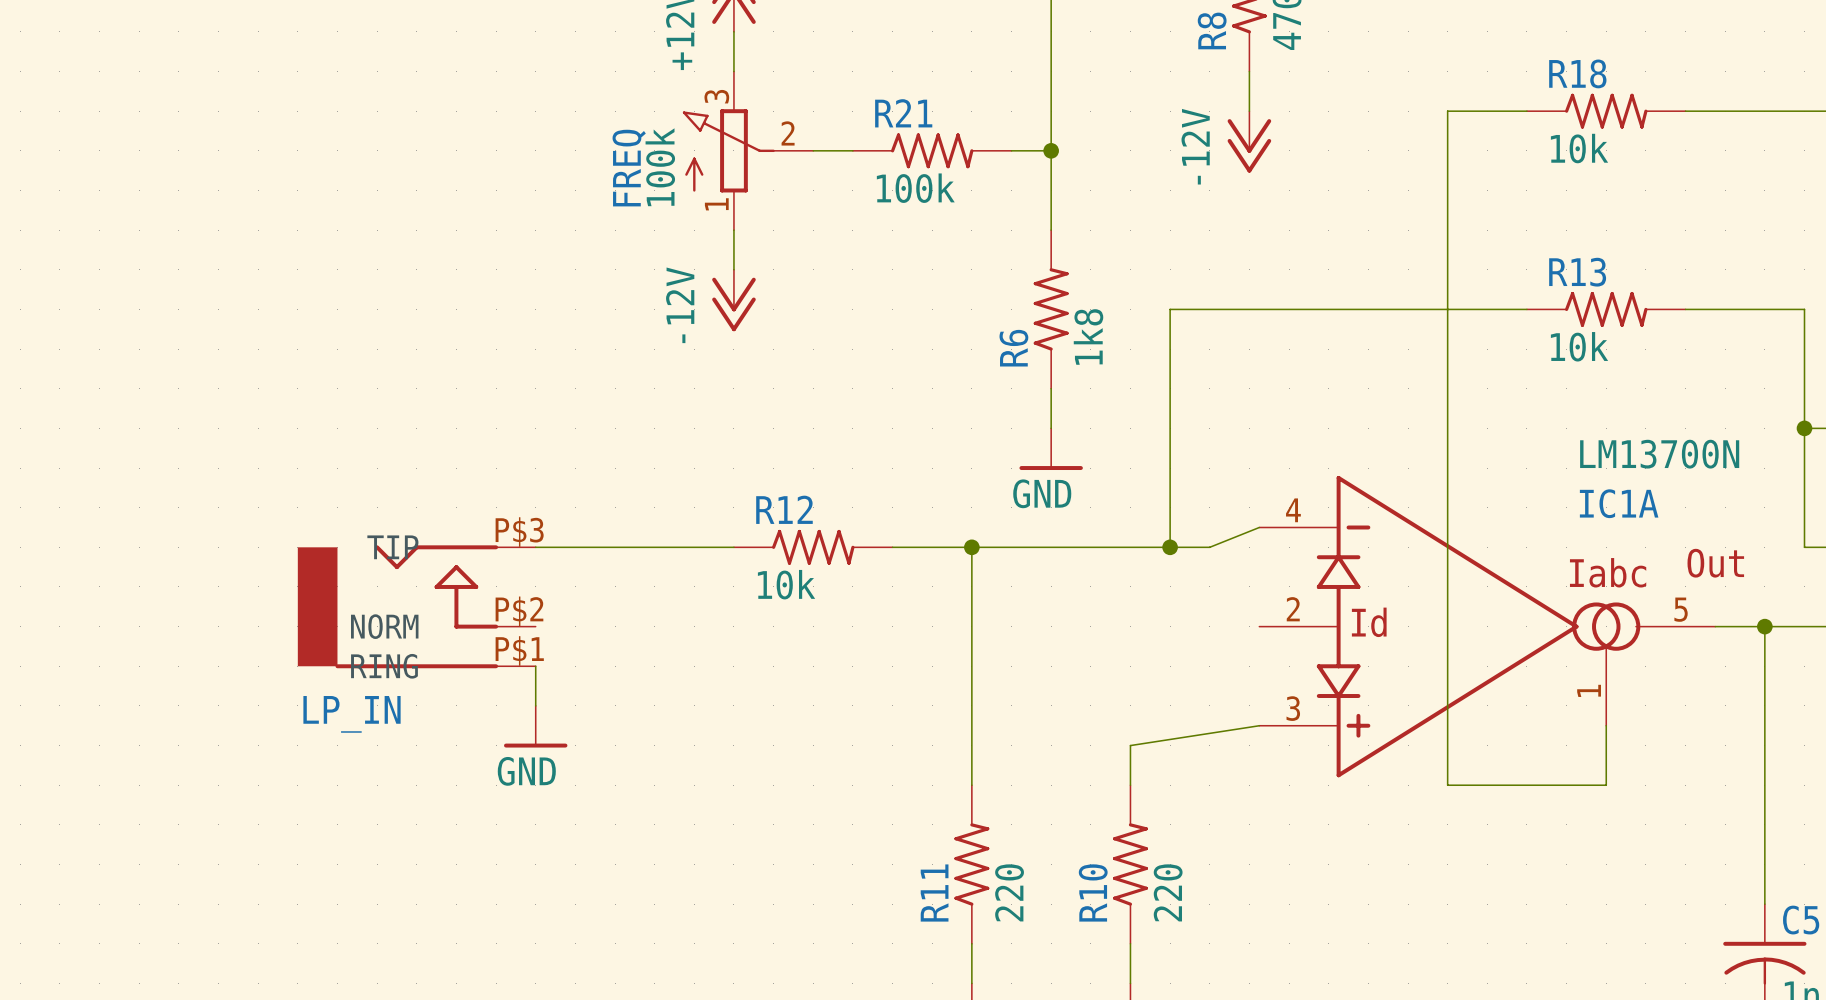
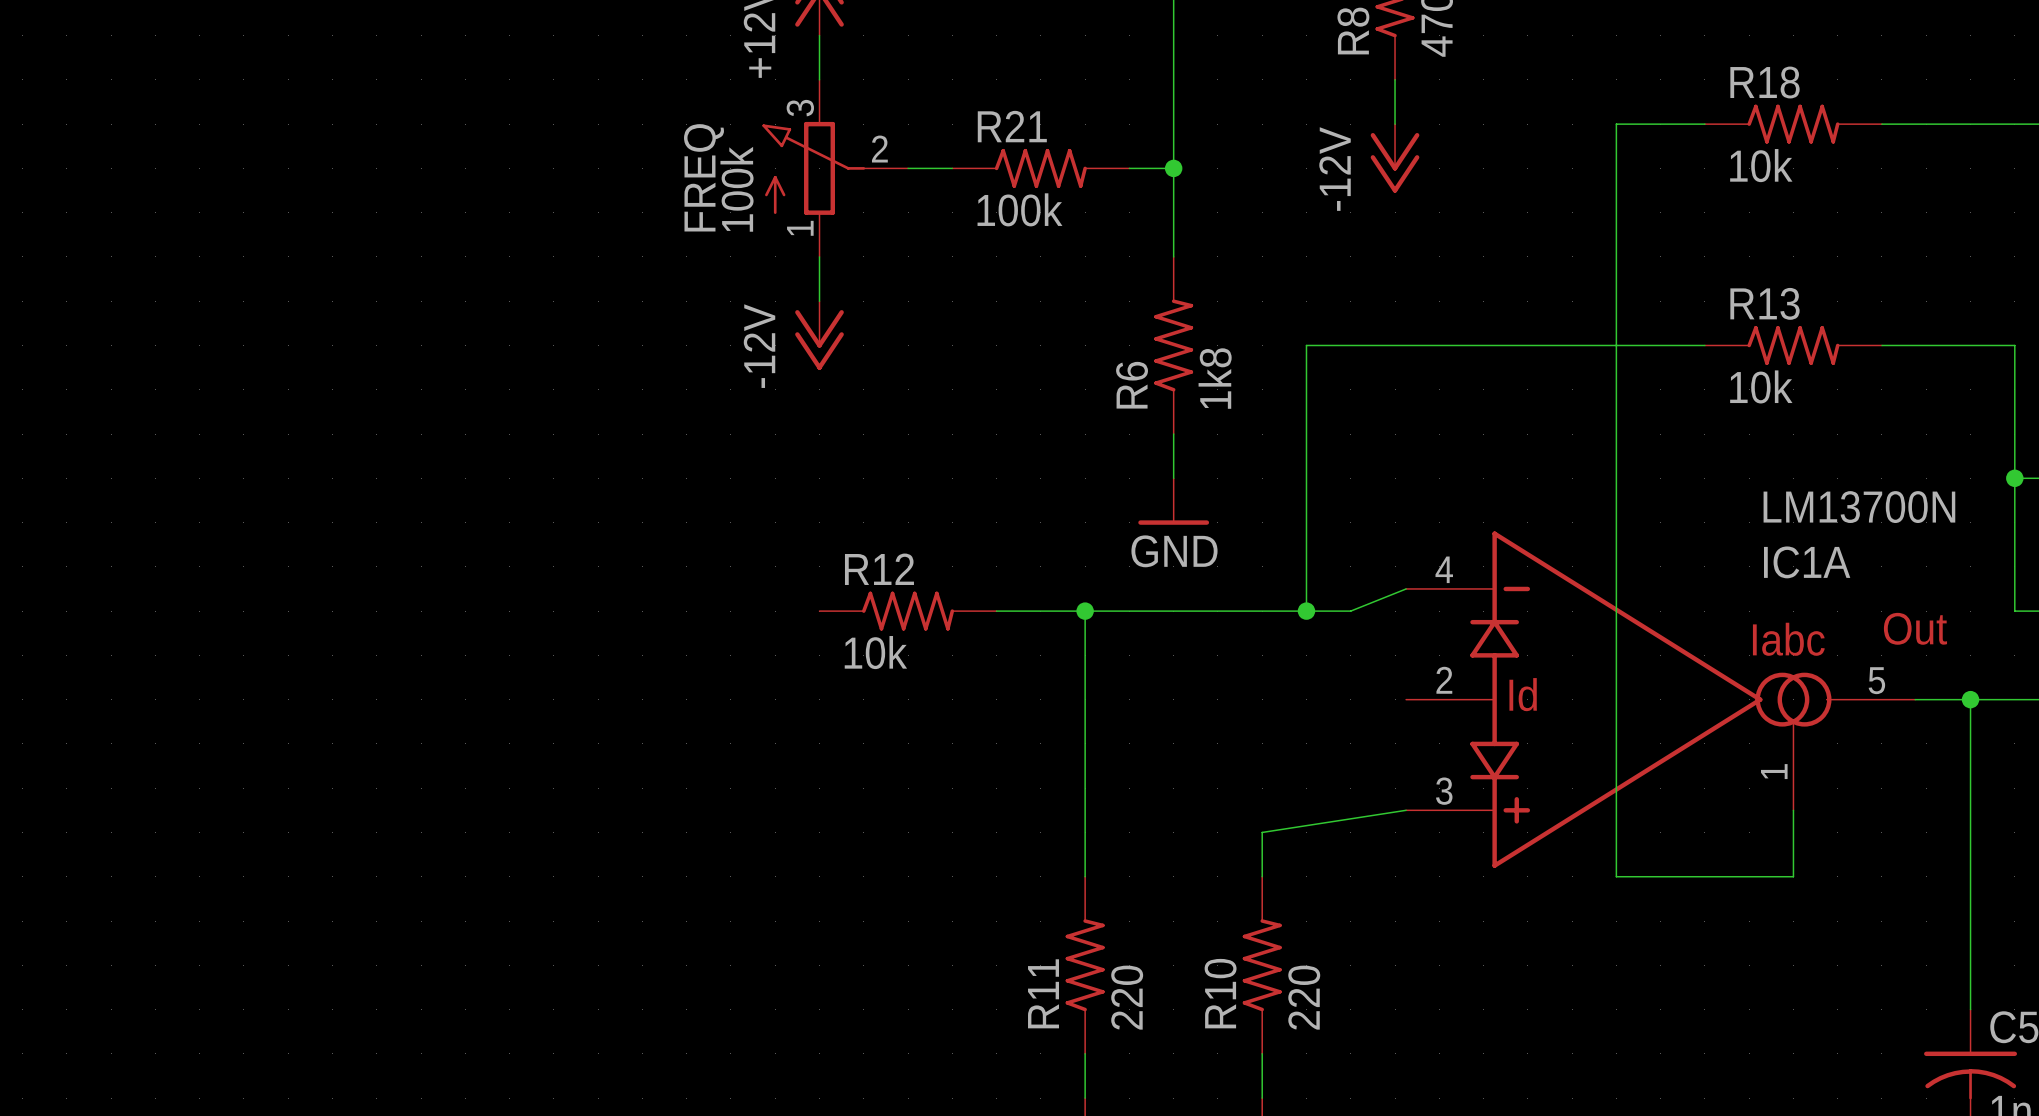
wire: (535, 547) (733, 547) -> none
LP_IN: (416, 606) -> none
wire: (535, 666) (535, 705) -> none
power symbol: GND (535, 726) -> none

